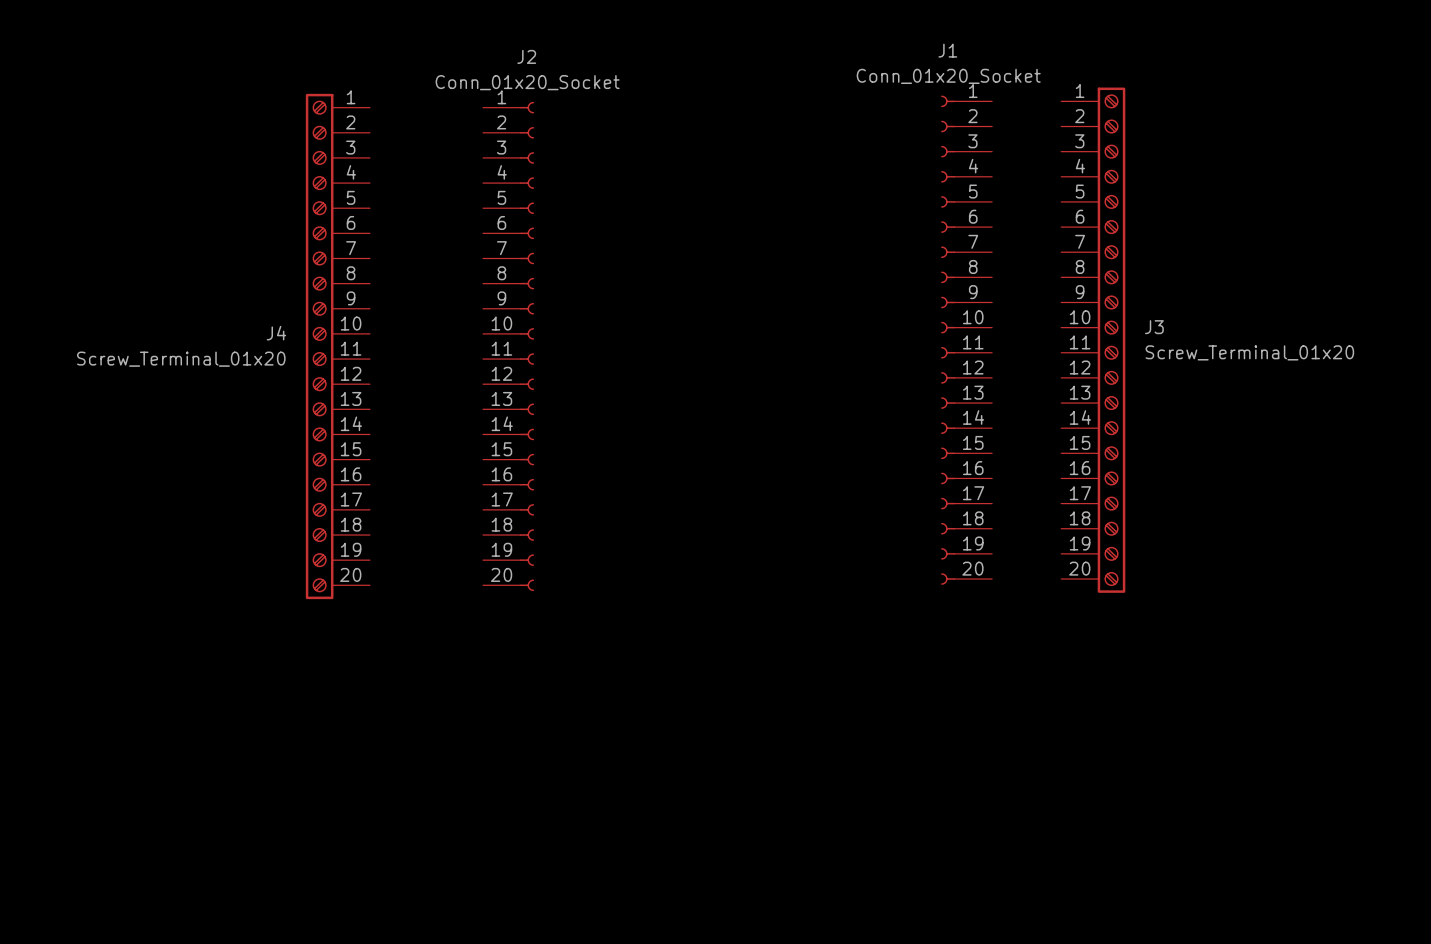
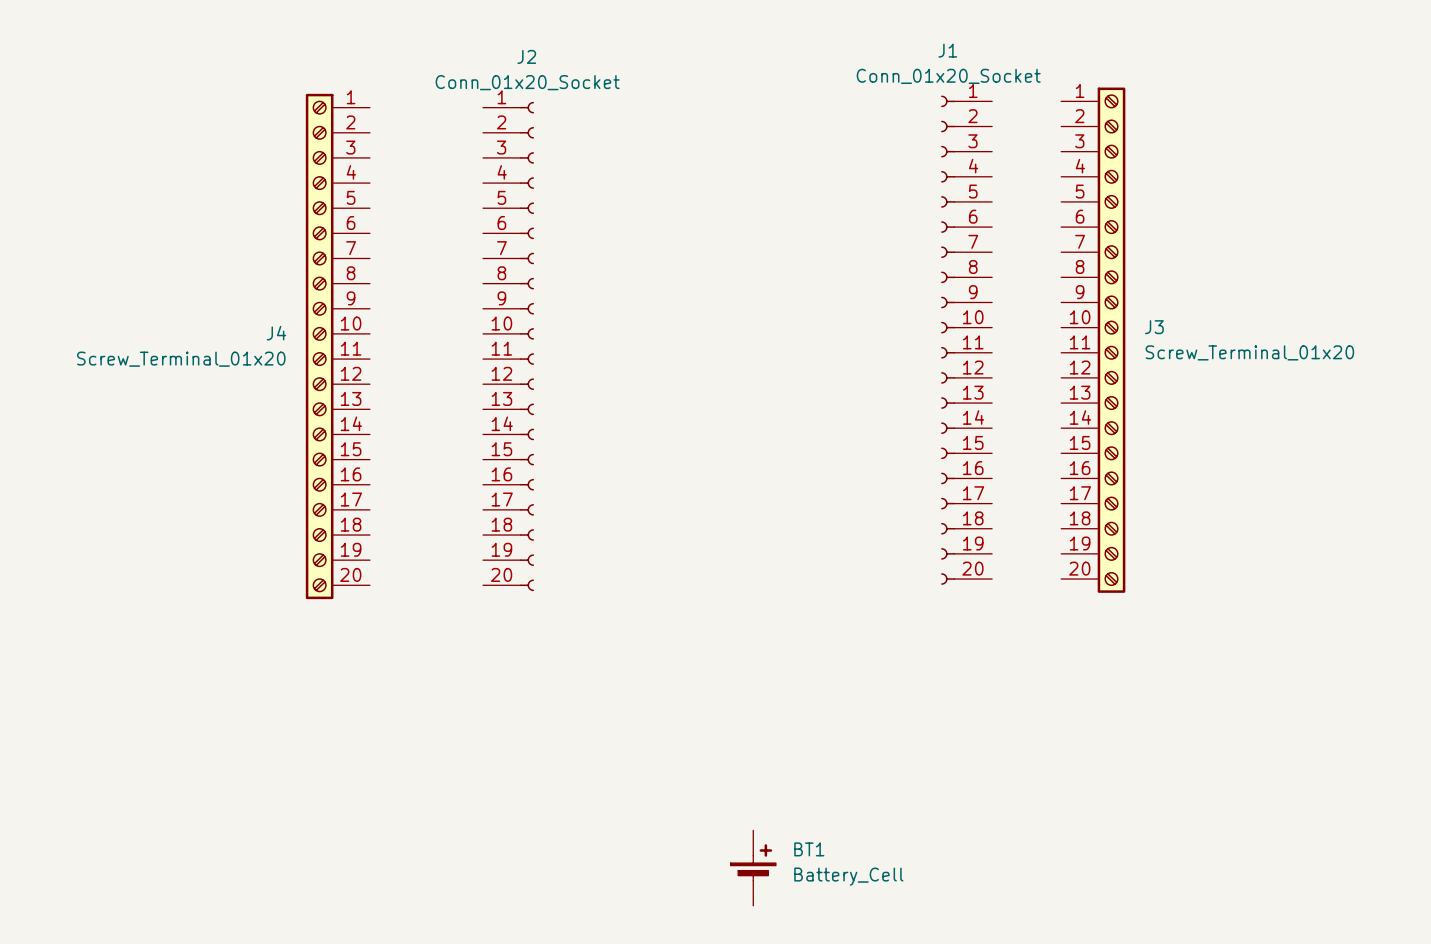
BT1: none -> Battery_Cell (753, 868)

